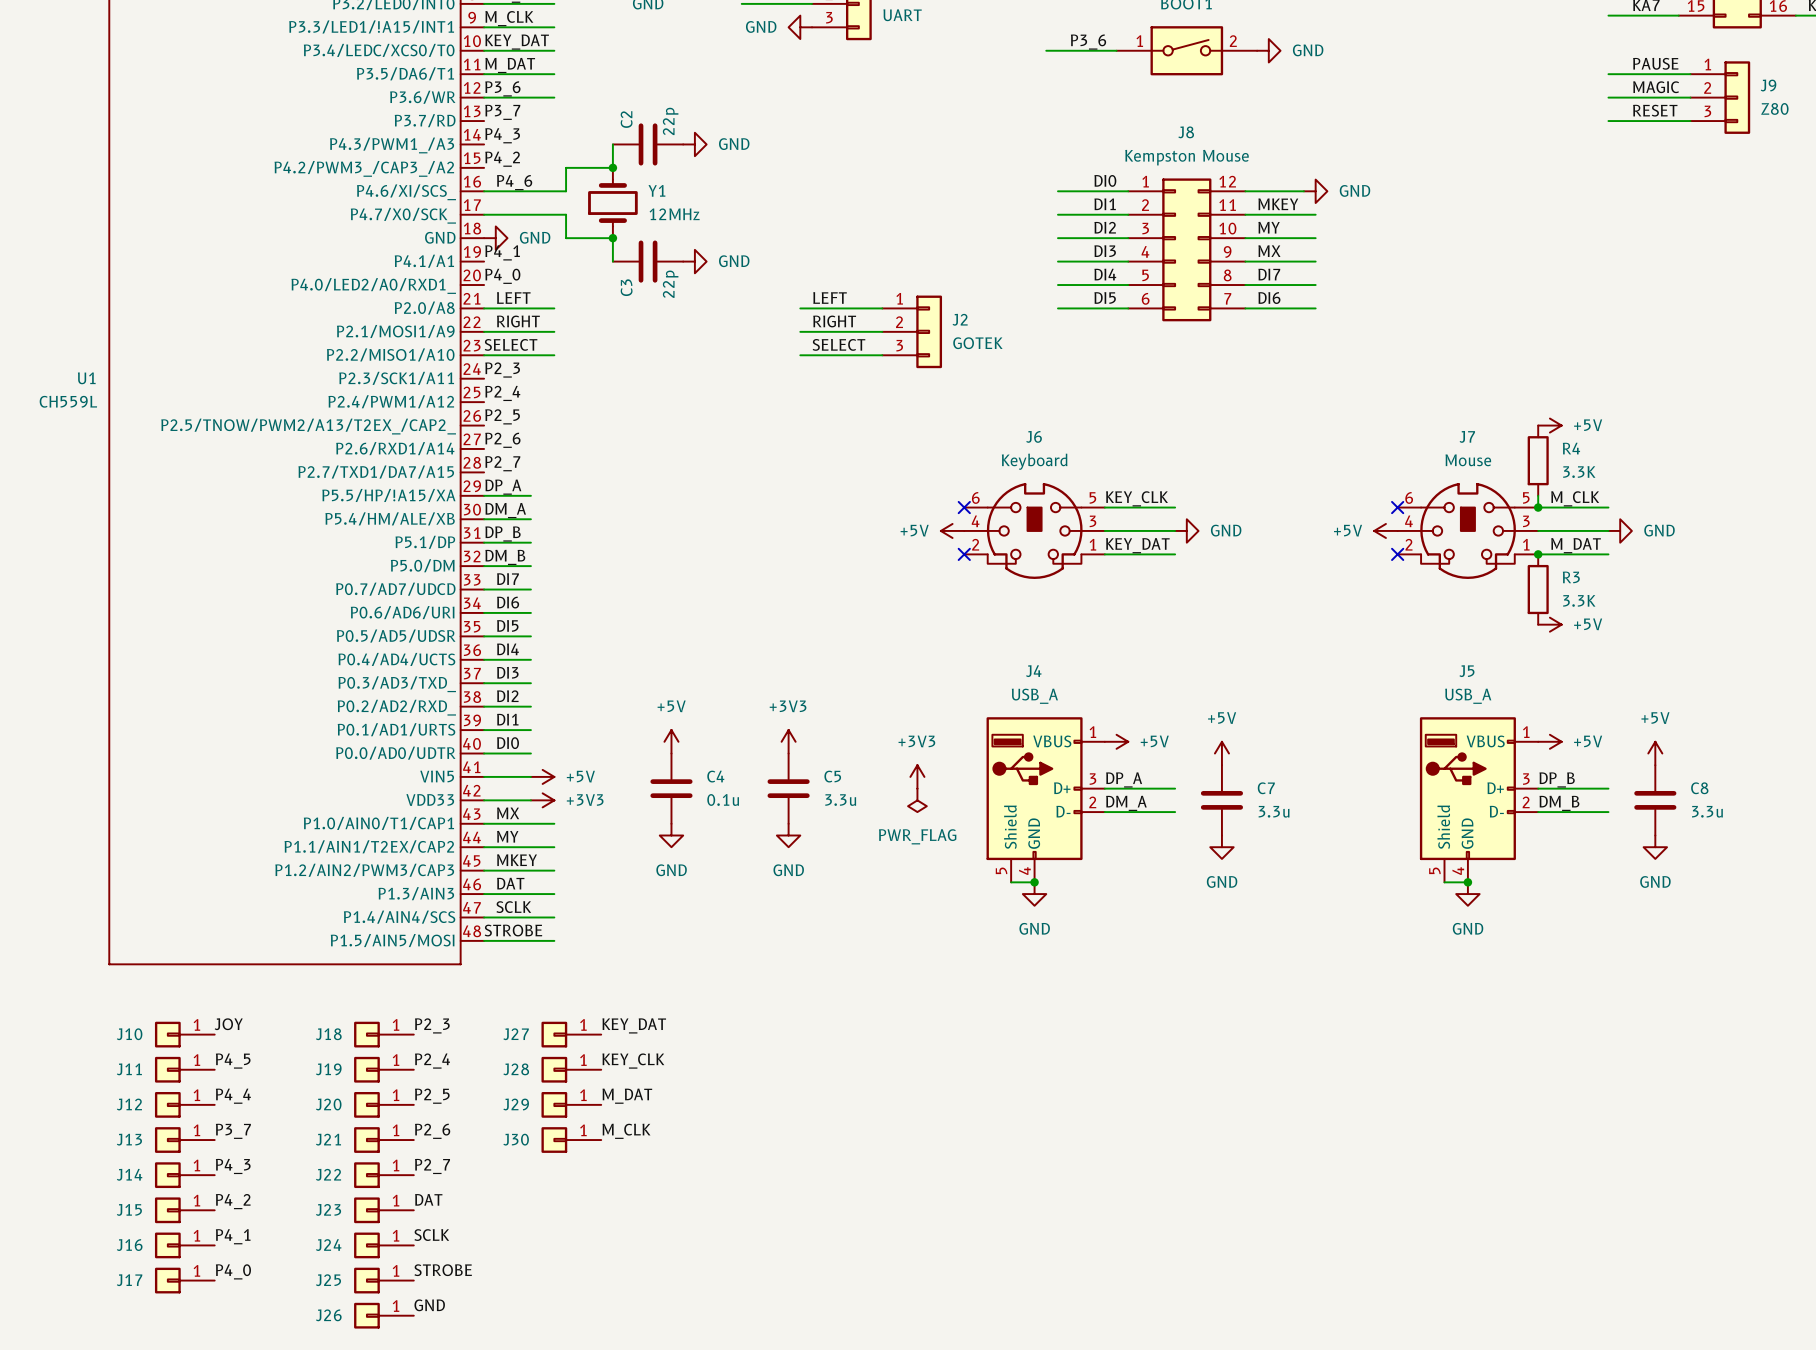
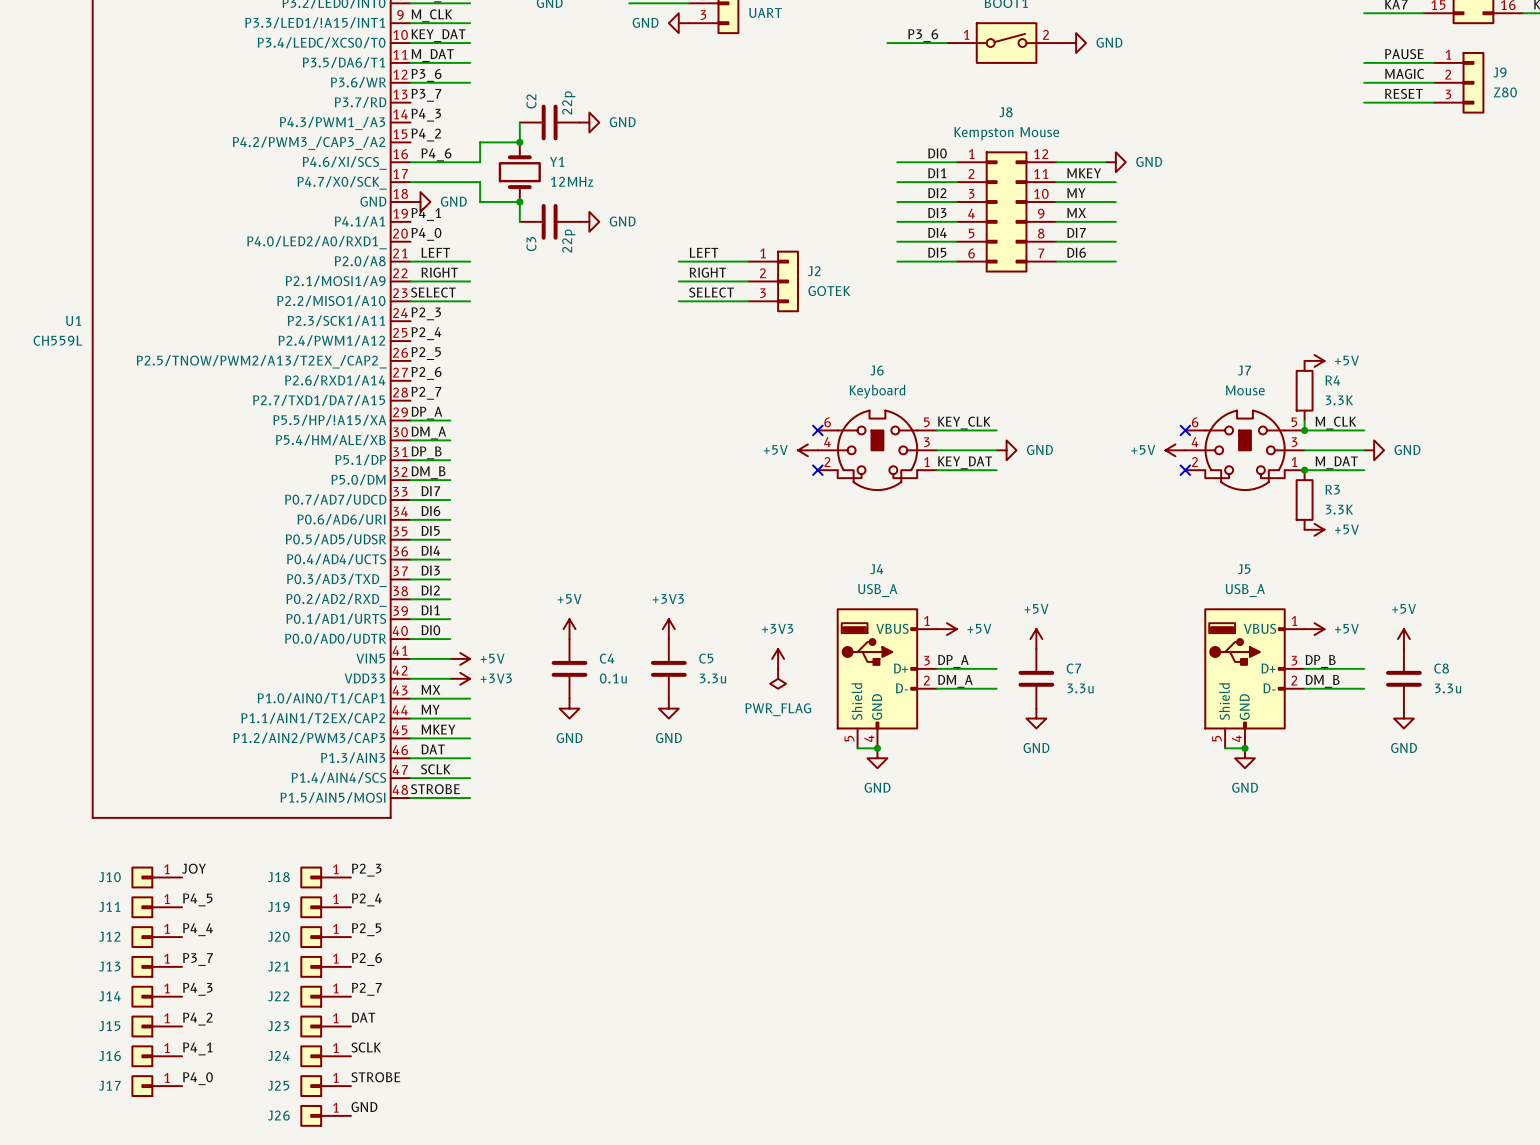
label: KEY_DAT (634, 1025) -> none
J27: (571, 1034) -> none
label: KEY_CLK (633, 1061) -> none
J28: (571, 1069) -> none
label: M_DAT (627, 1096) -> none
J29: (571, 1104) -> none
label: M_CLK (626, 1131) -> none
J30: (571, 1140) -> none

